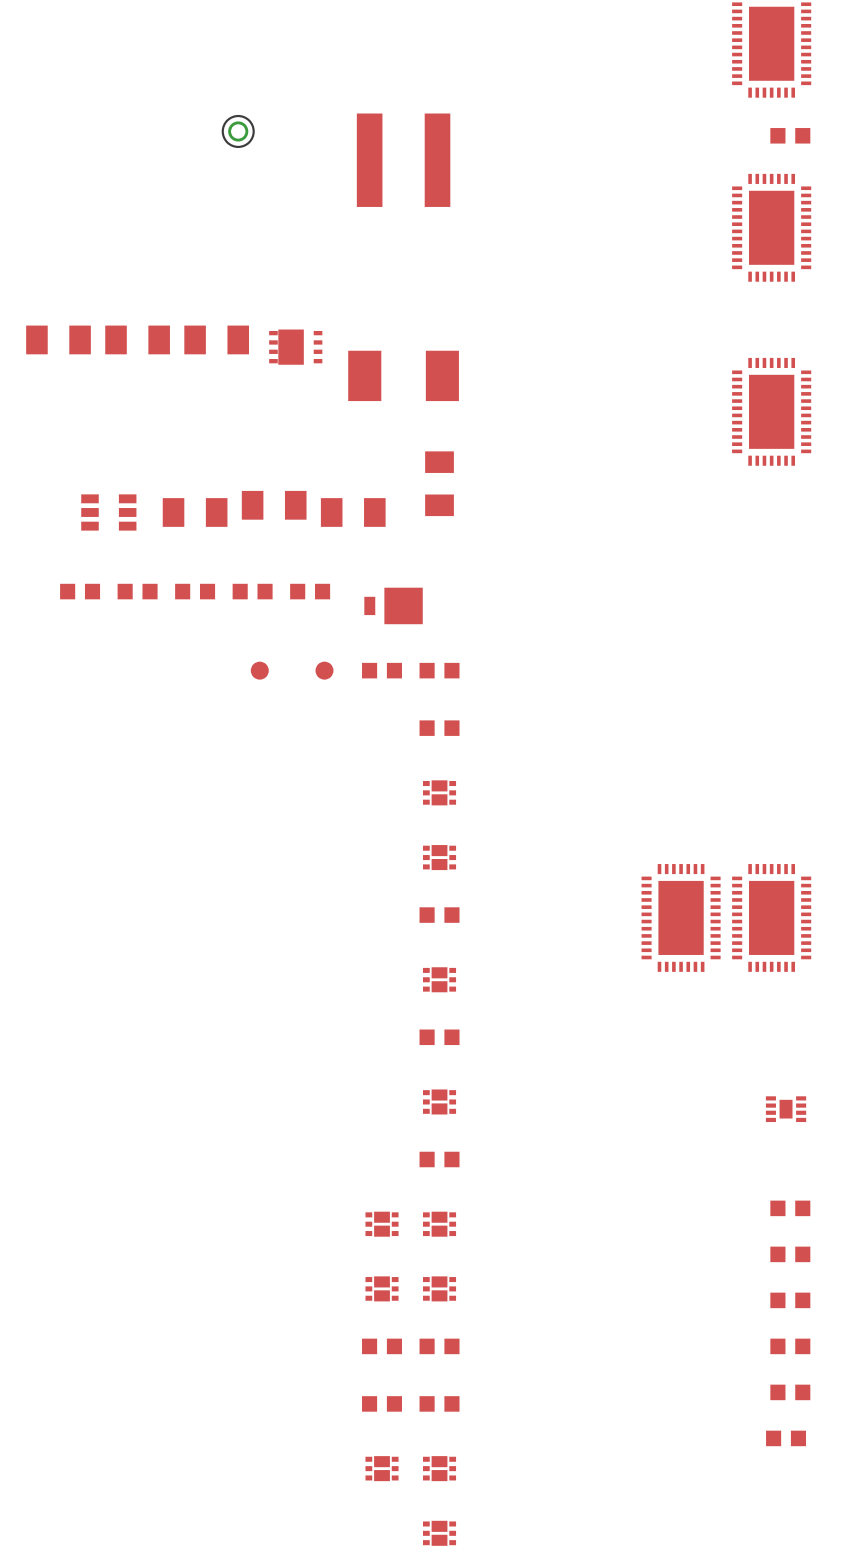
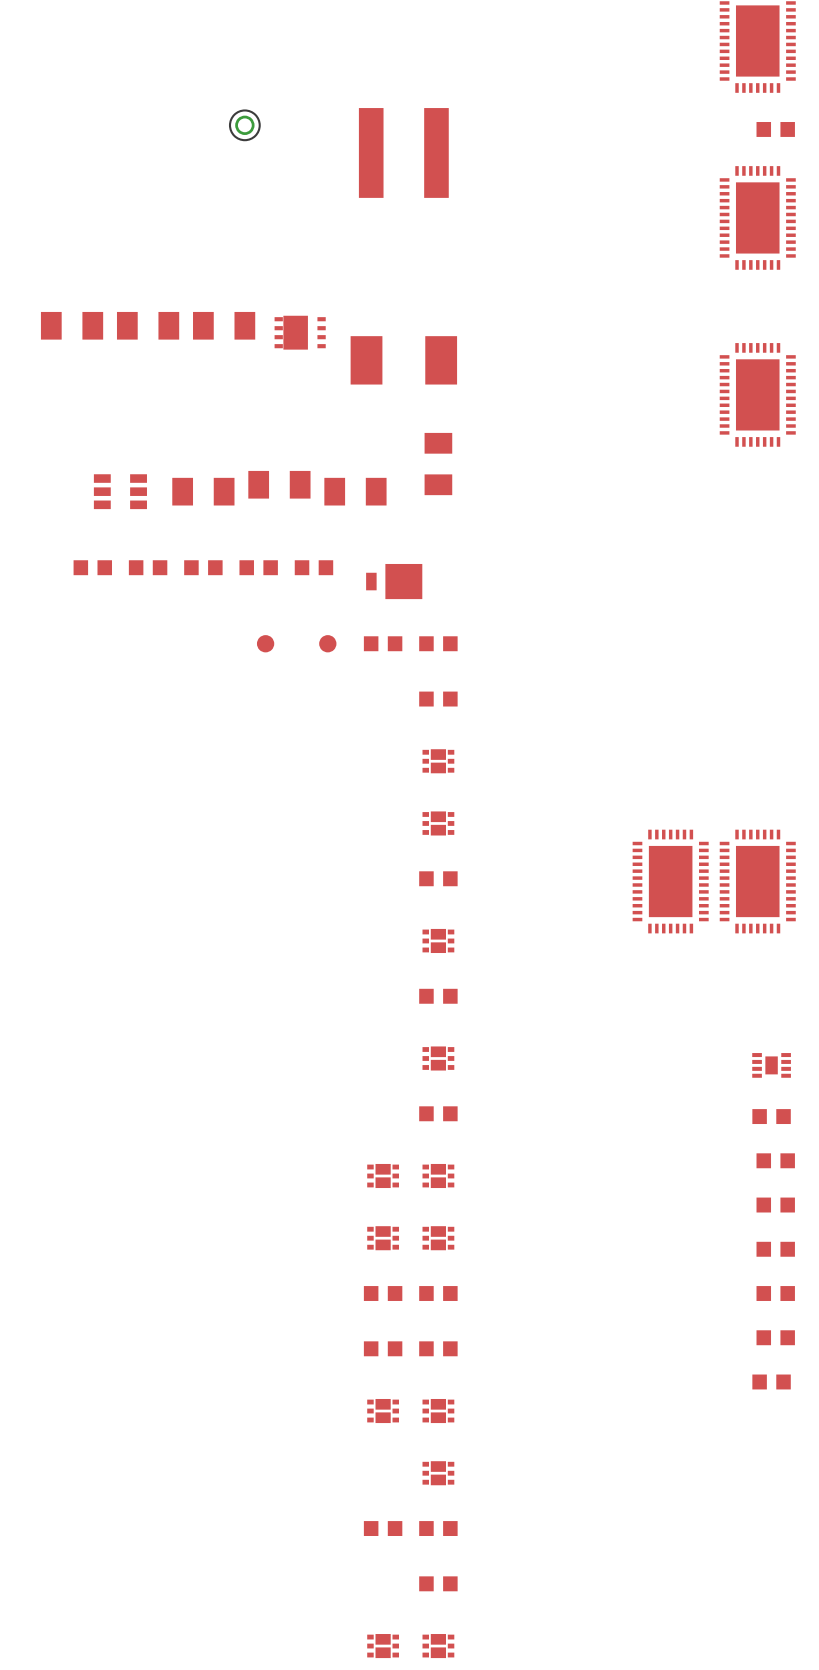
part: none -> (771, 1116)

